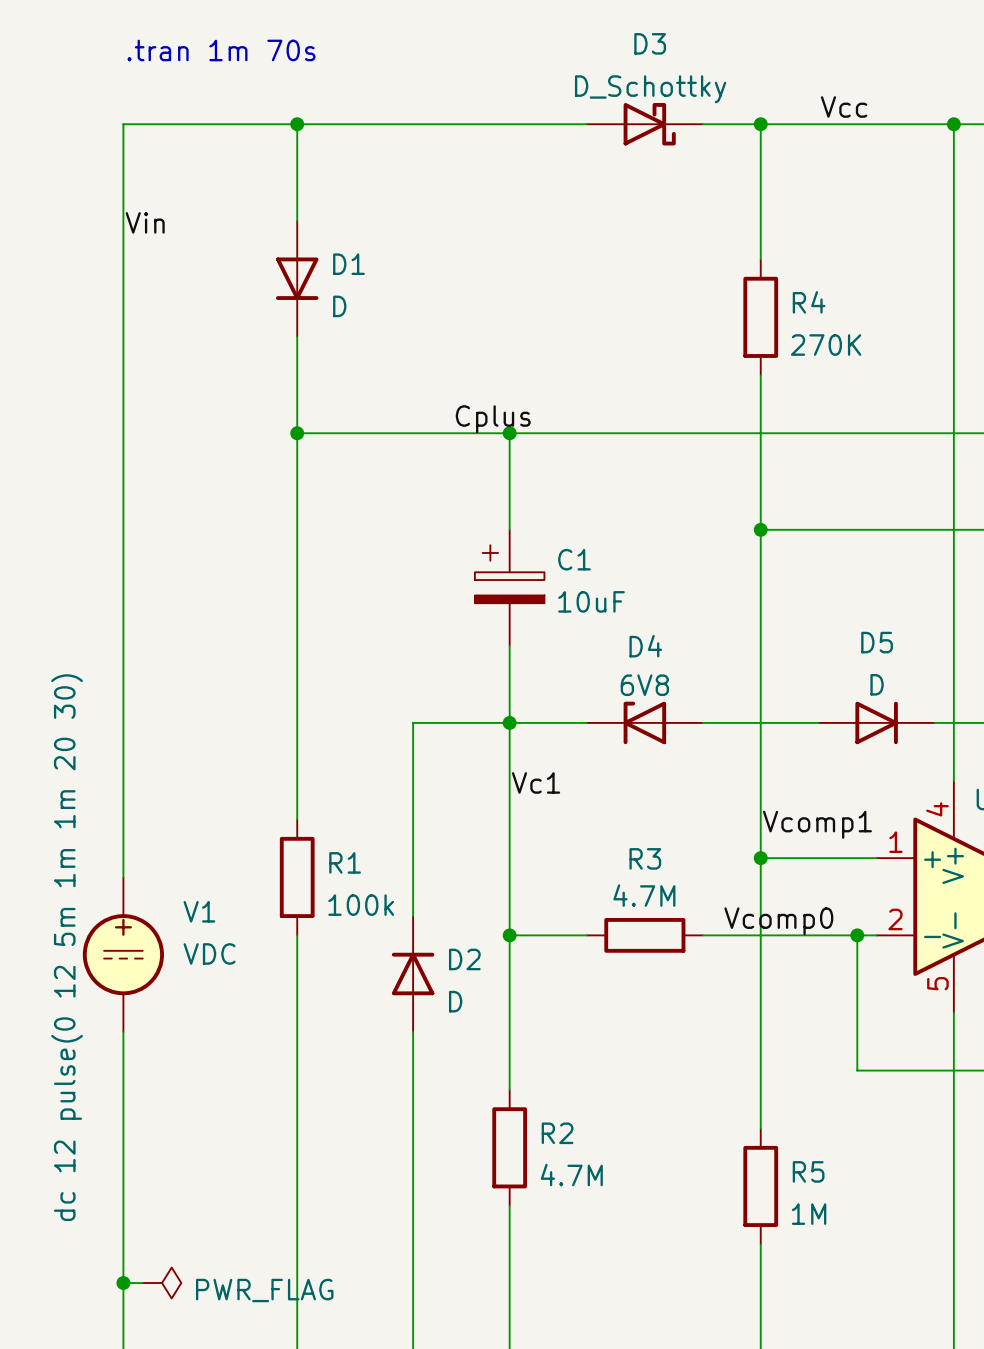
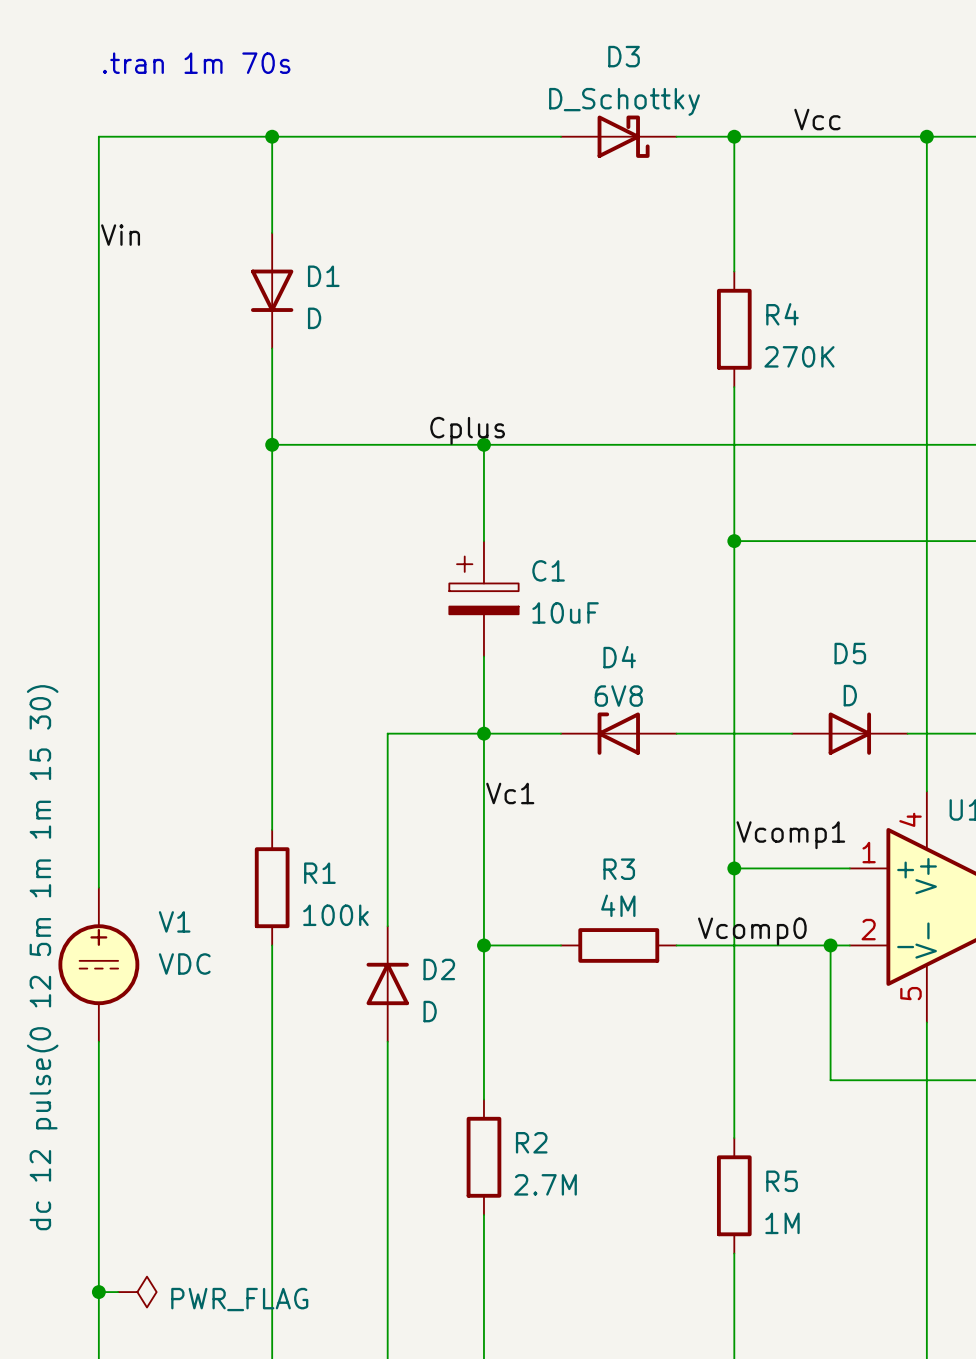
R3 value: 4.7M (644, 895) -> 4M (618, 905)
V1 text: dc 12 pulse(0 12 5m 1m 1m 20 30) (67, 947) -> dc 12 pulse(0 12 5m 1m 1m 15 30) (42, 957)
R2 value: 4.7M (571, 1175) -> 2.7M (545, 1184)

